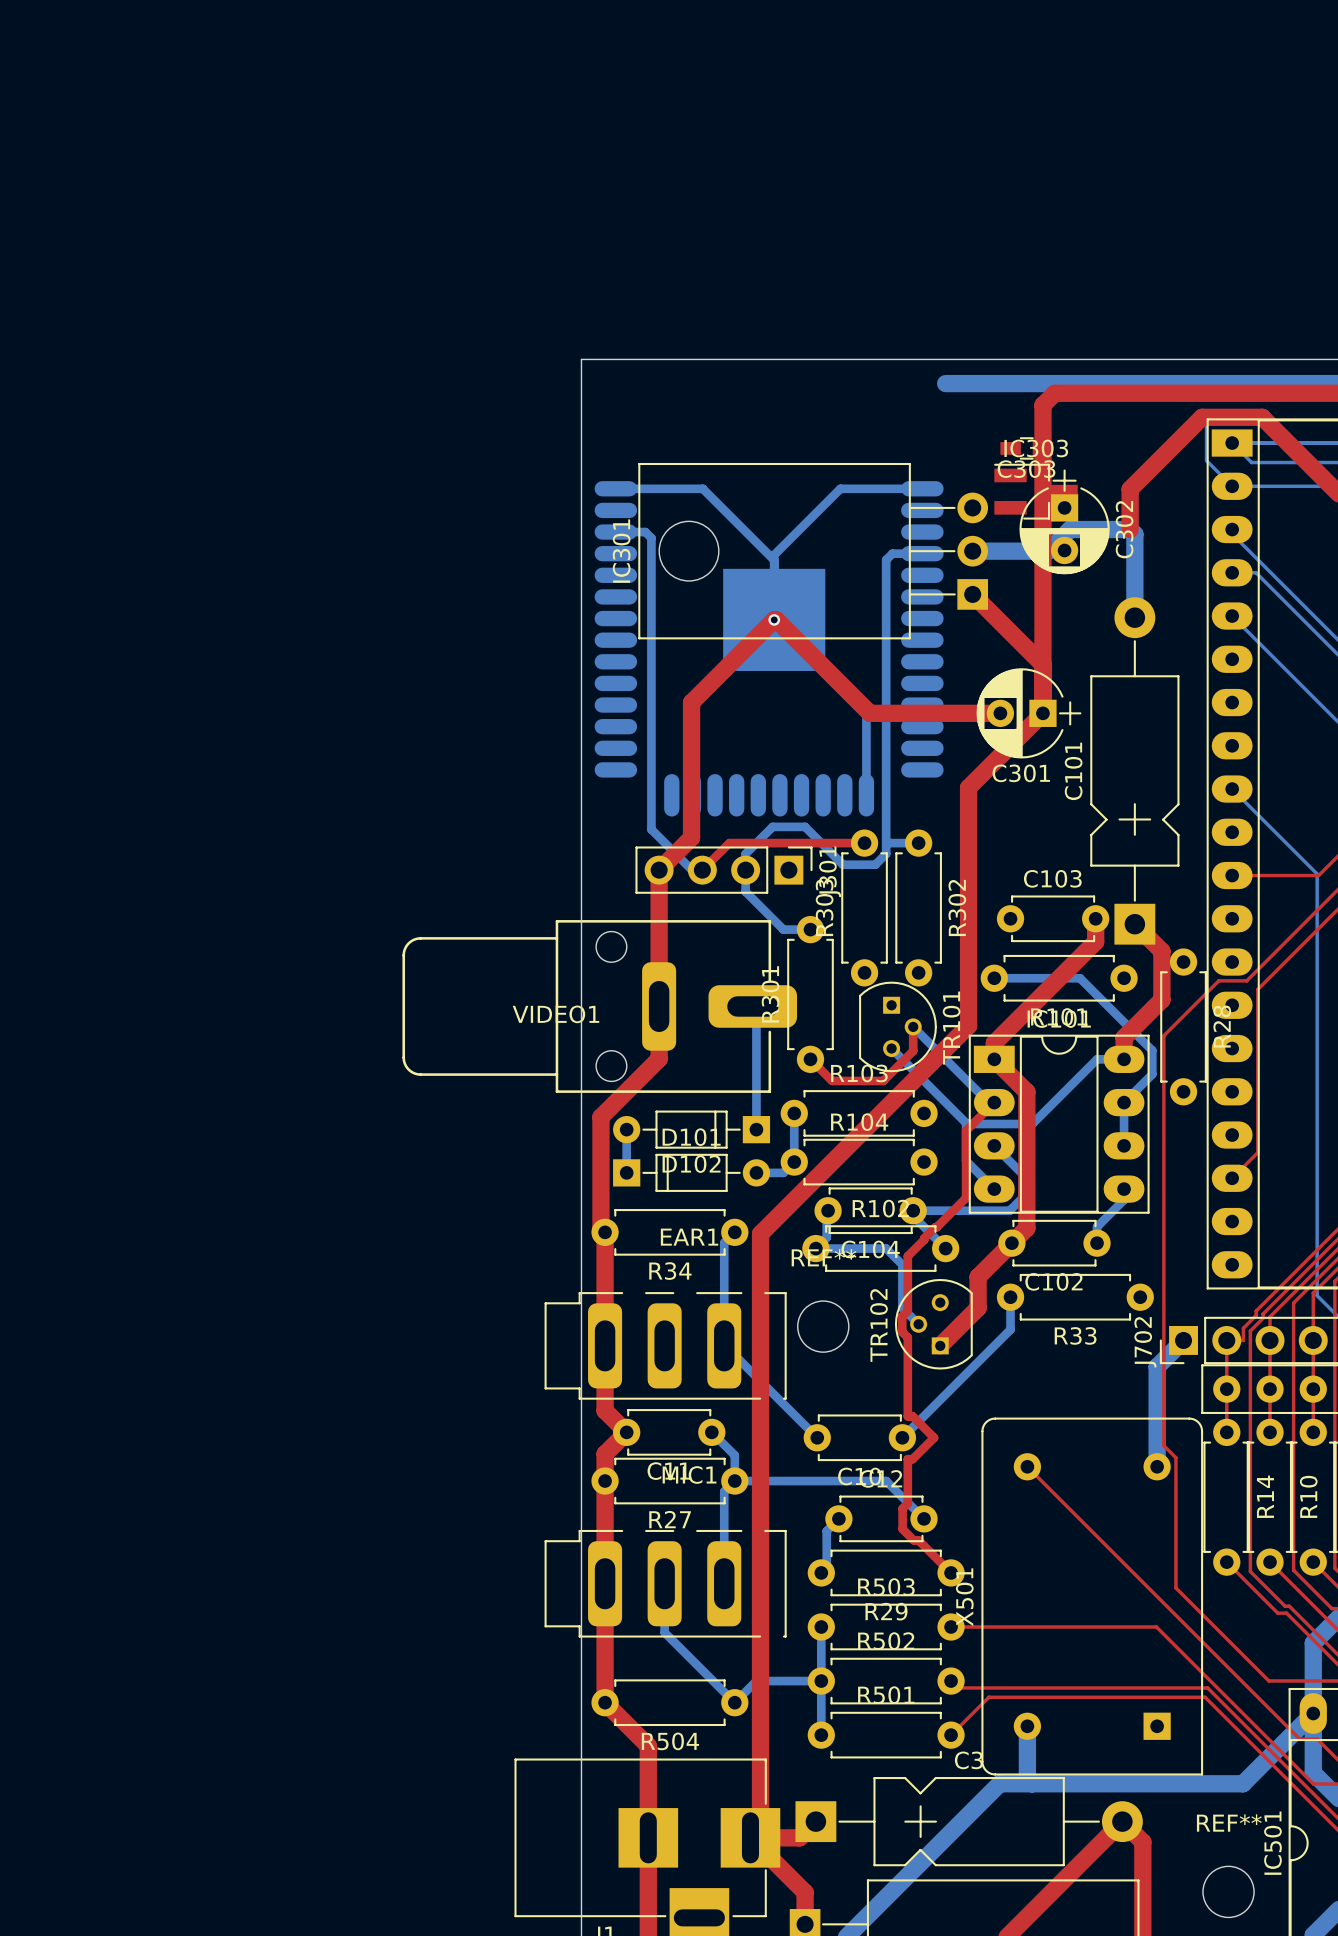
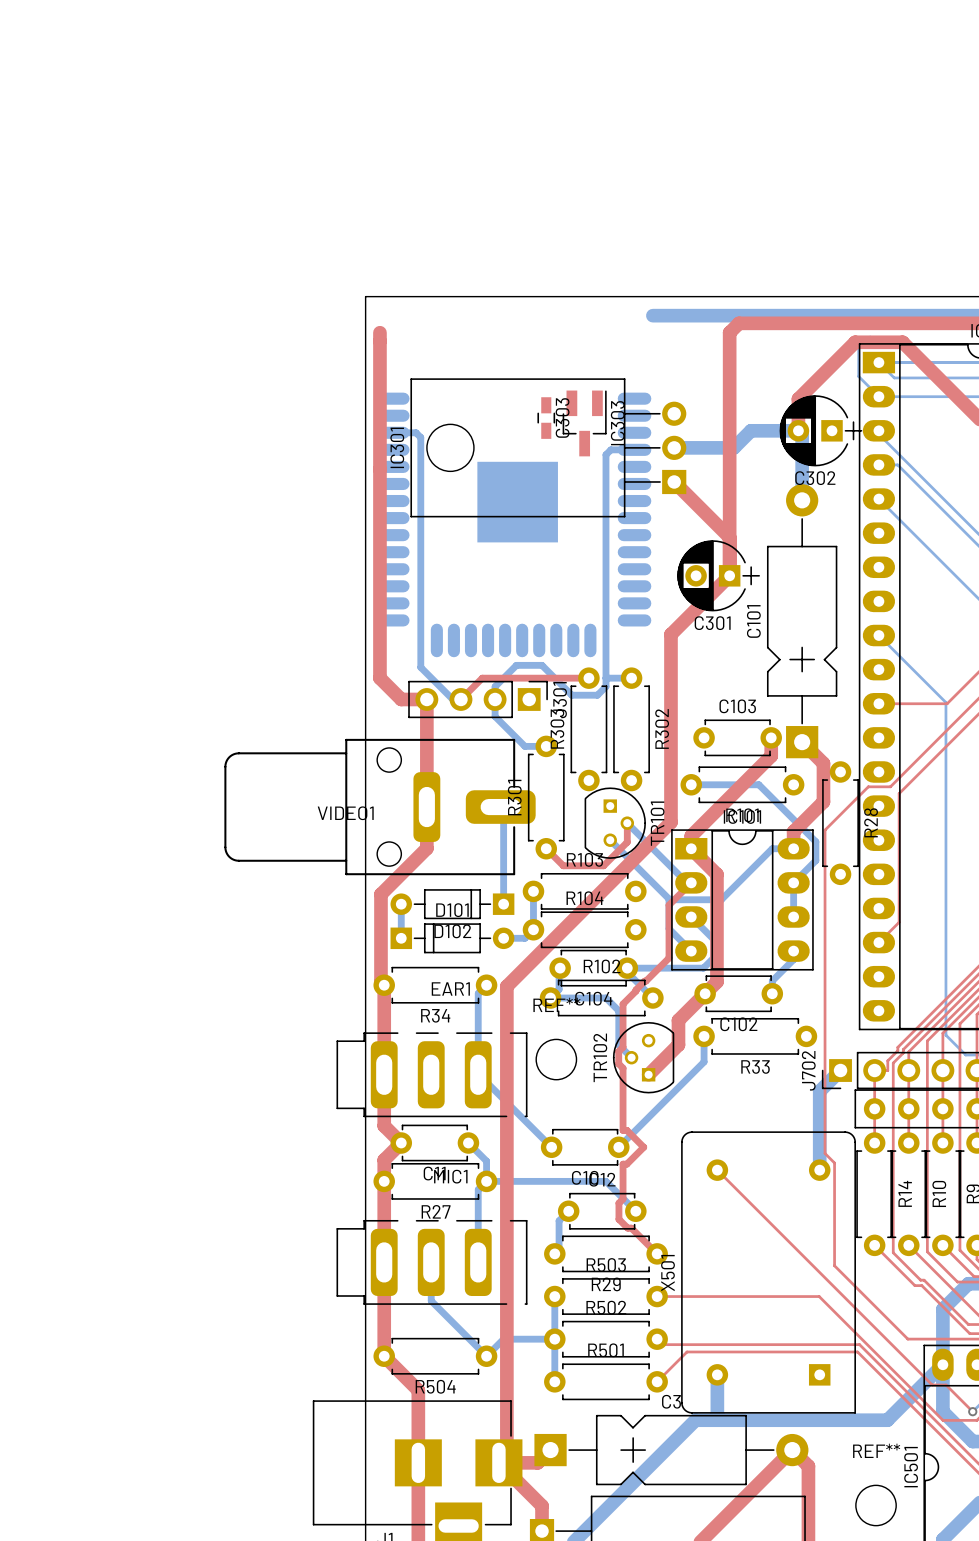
C303 rotation: 0° (1026, 448) -> 90° clockwise (546, 418)
C303 position: (1026, 448) -> (546, 418)
bottom track: (615, 488) (702, 488) (774, 560) -> none
bottom track: (922, 488) (840, 488) (774, 555) (774, 619) (866, 712) (866, 795) -> none
IC303 rotation: 0° (1035, 491) -> 90° clockwise (584, 423)
IC303 position: (1035, 491) -> (584, 423)
C302 rotation: 0° (1064, 521) -> 90° clockwise (820, 430)
C302 position: (1064, 521) -> (820, 430)
via: (774, 619) -> none
top track: (1000, 713) (869, 713) (776, 619) (774, 619) (691, 702) (691, 837) (659, 870) -> (379, 332) (379, 678) (401, 699) (426, 699)

